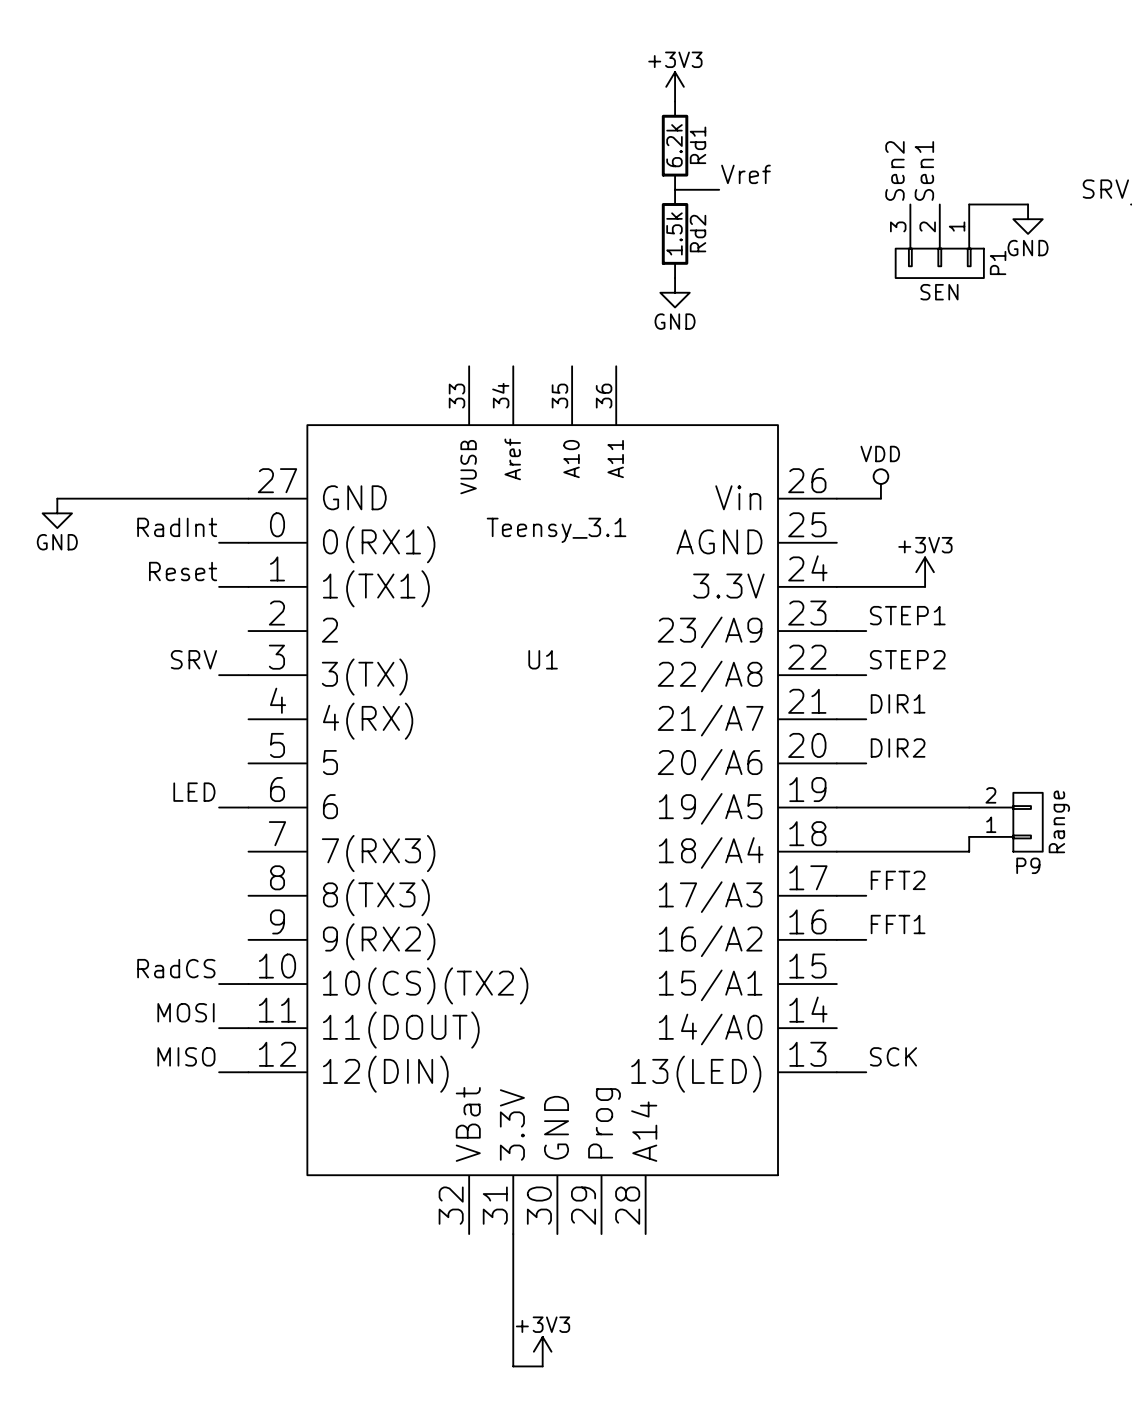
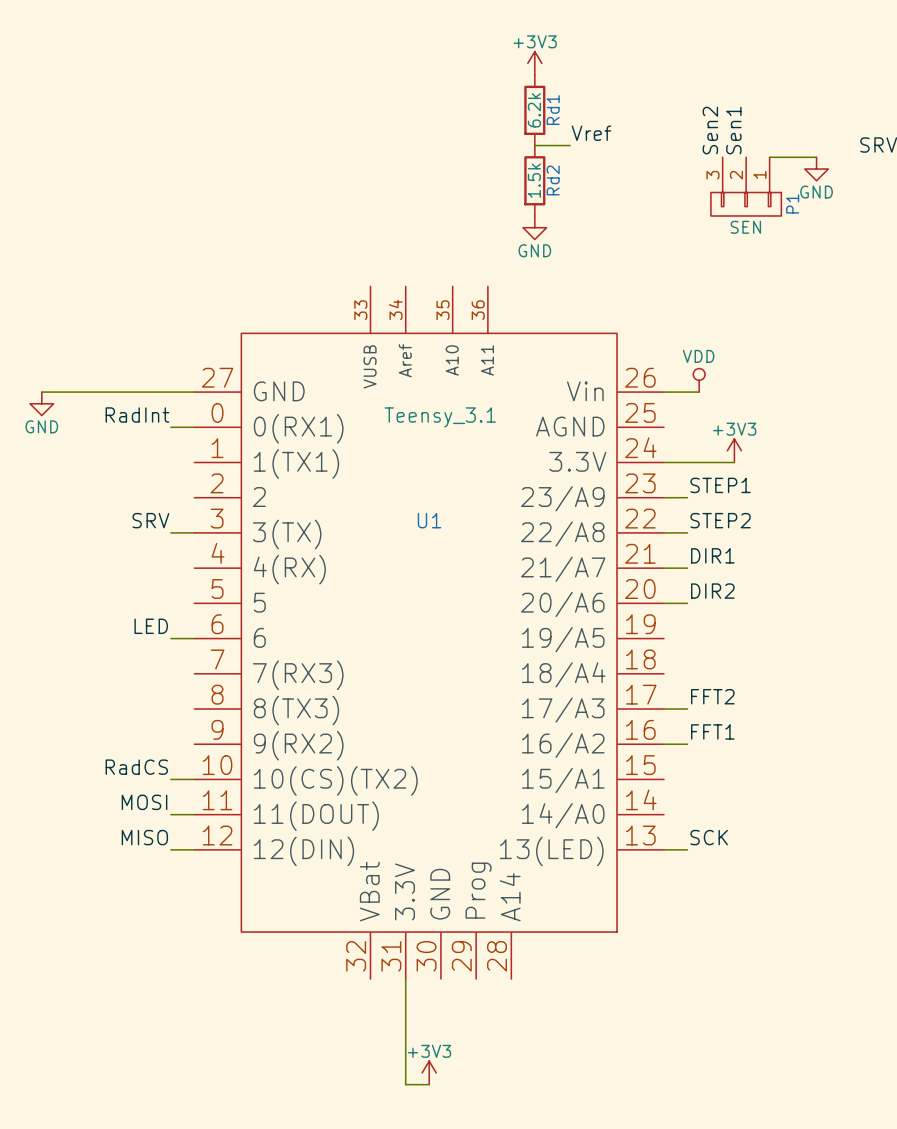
label: Reset (183, 571) -> none
wire: (219, 586) (248, 586) -> none
wire: (836, 807) (969, 807) -> none
P9: Range (1005, 822) -> none
wire: (969, 836) (969, 851) (836, 851) -> none

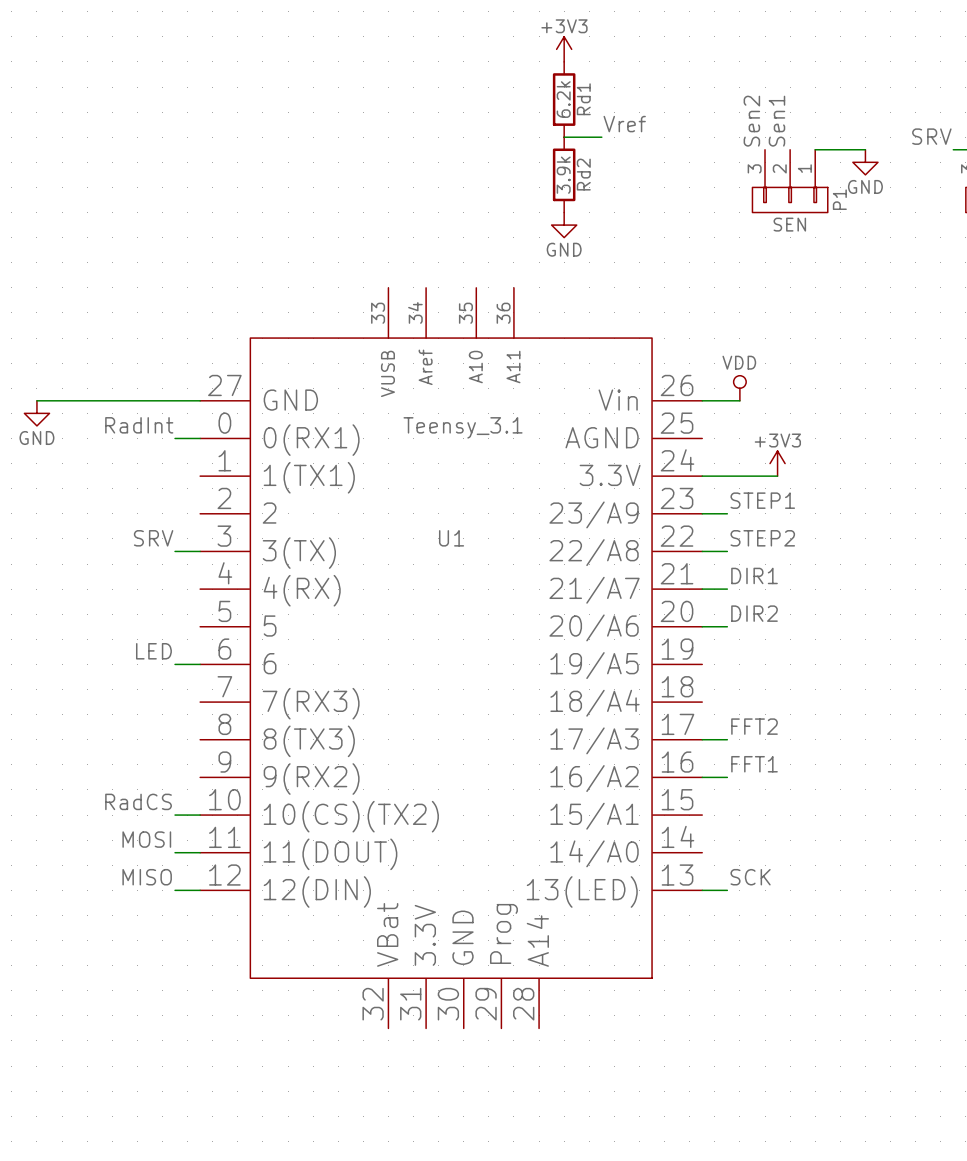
Rd2 value: 1.5k (534, 180) -> 3.9k (563, 175)
wire: (405, 979) (405, 1084) (429, 1084) -> none
power symbol: +3V3 (429, 1072) -> none

